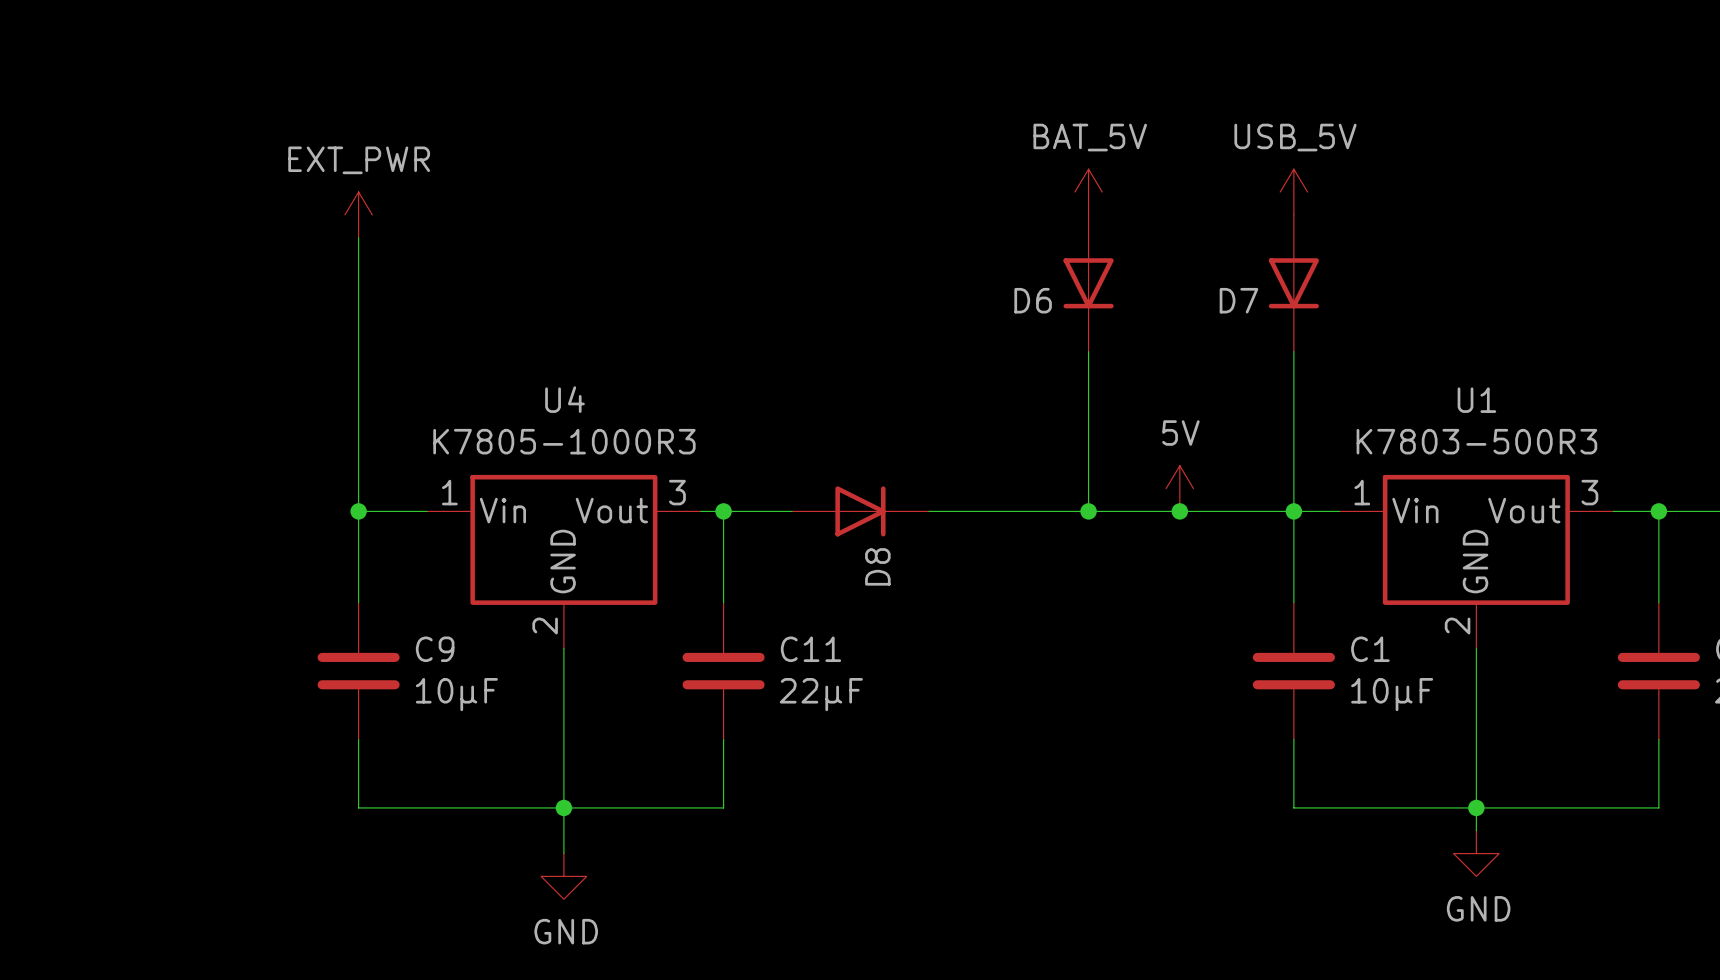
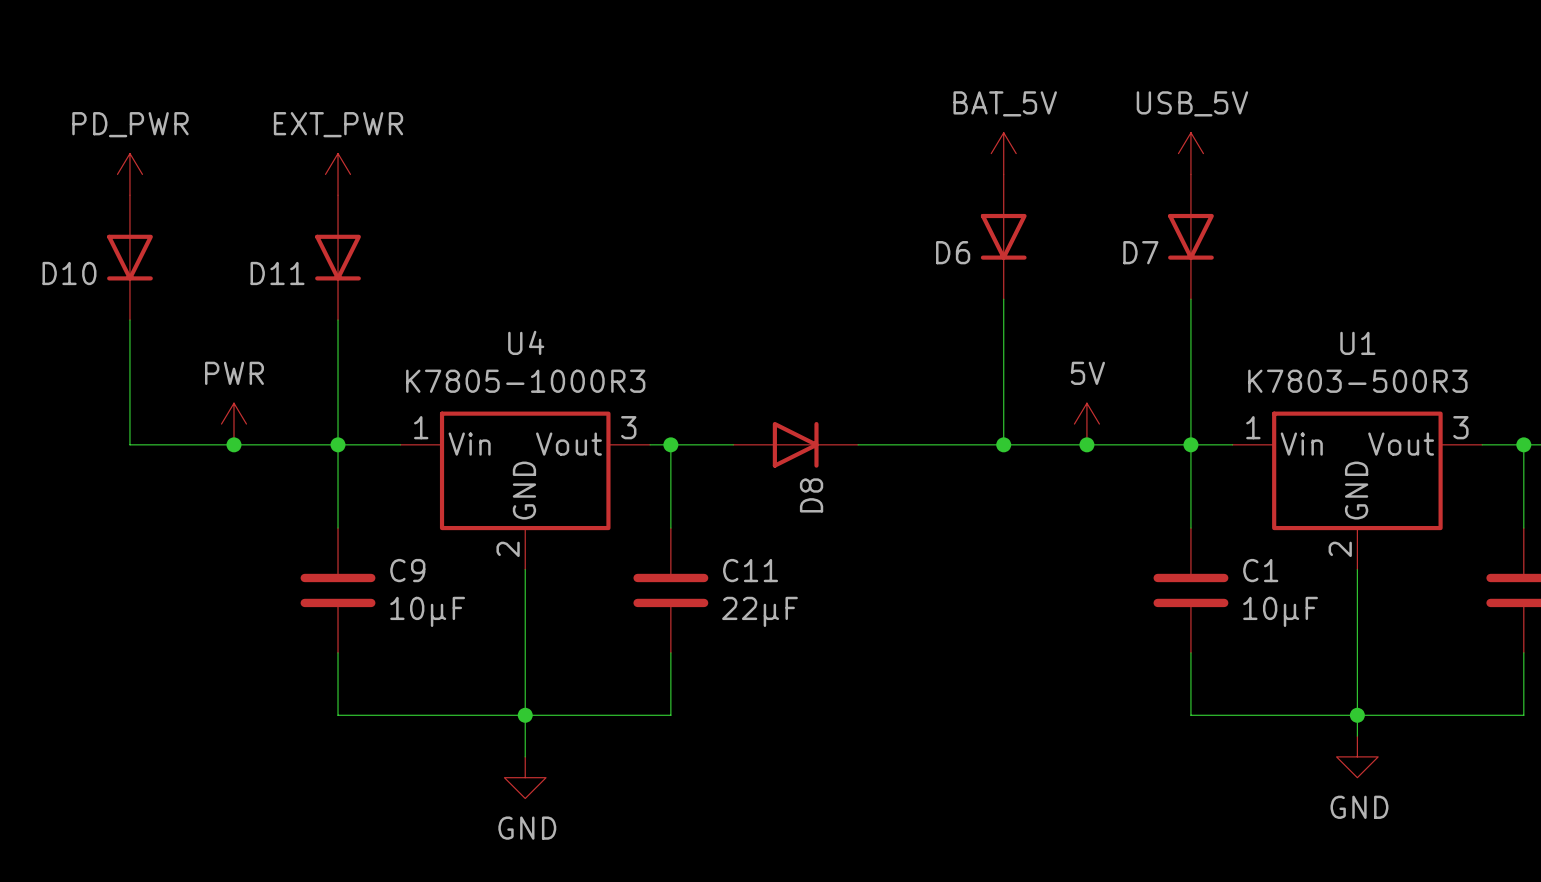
power symbol: none -> PD_PWR (129, 174)
D10: none -> (129, 257)
D11: none -> (338, 257)
wire: none -> (129, 320) (129, 444) (338, 444)
power symbol: none -> PWR (233, 424)
junction: none -> (233, 444)

